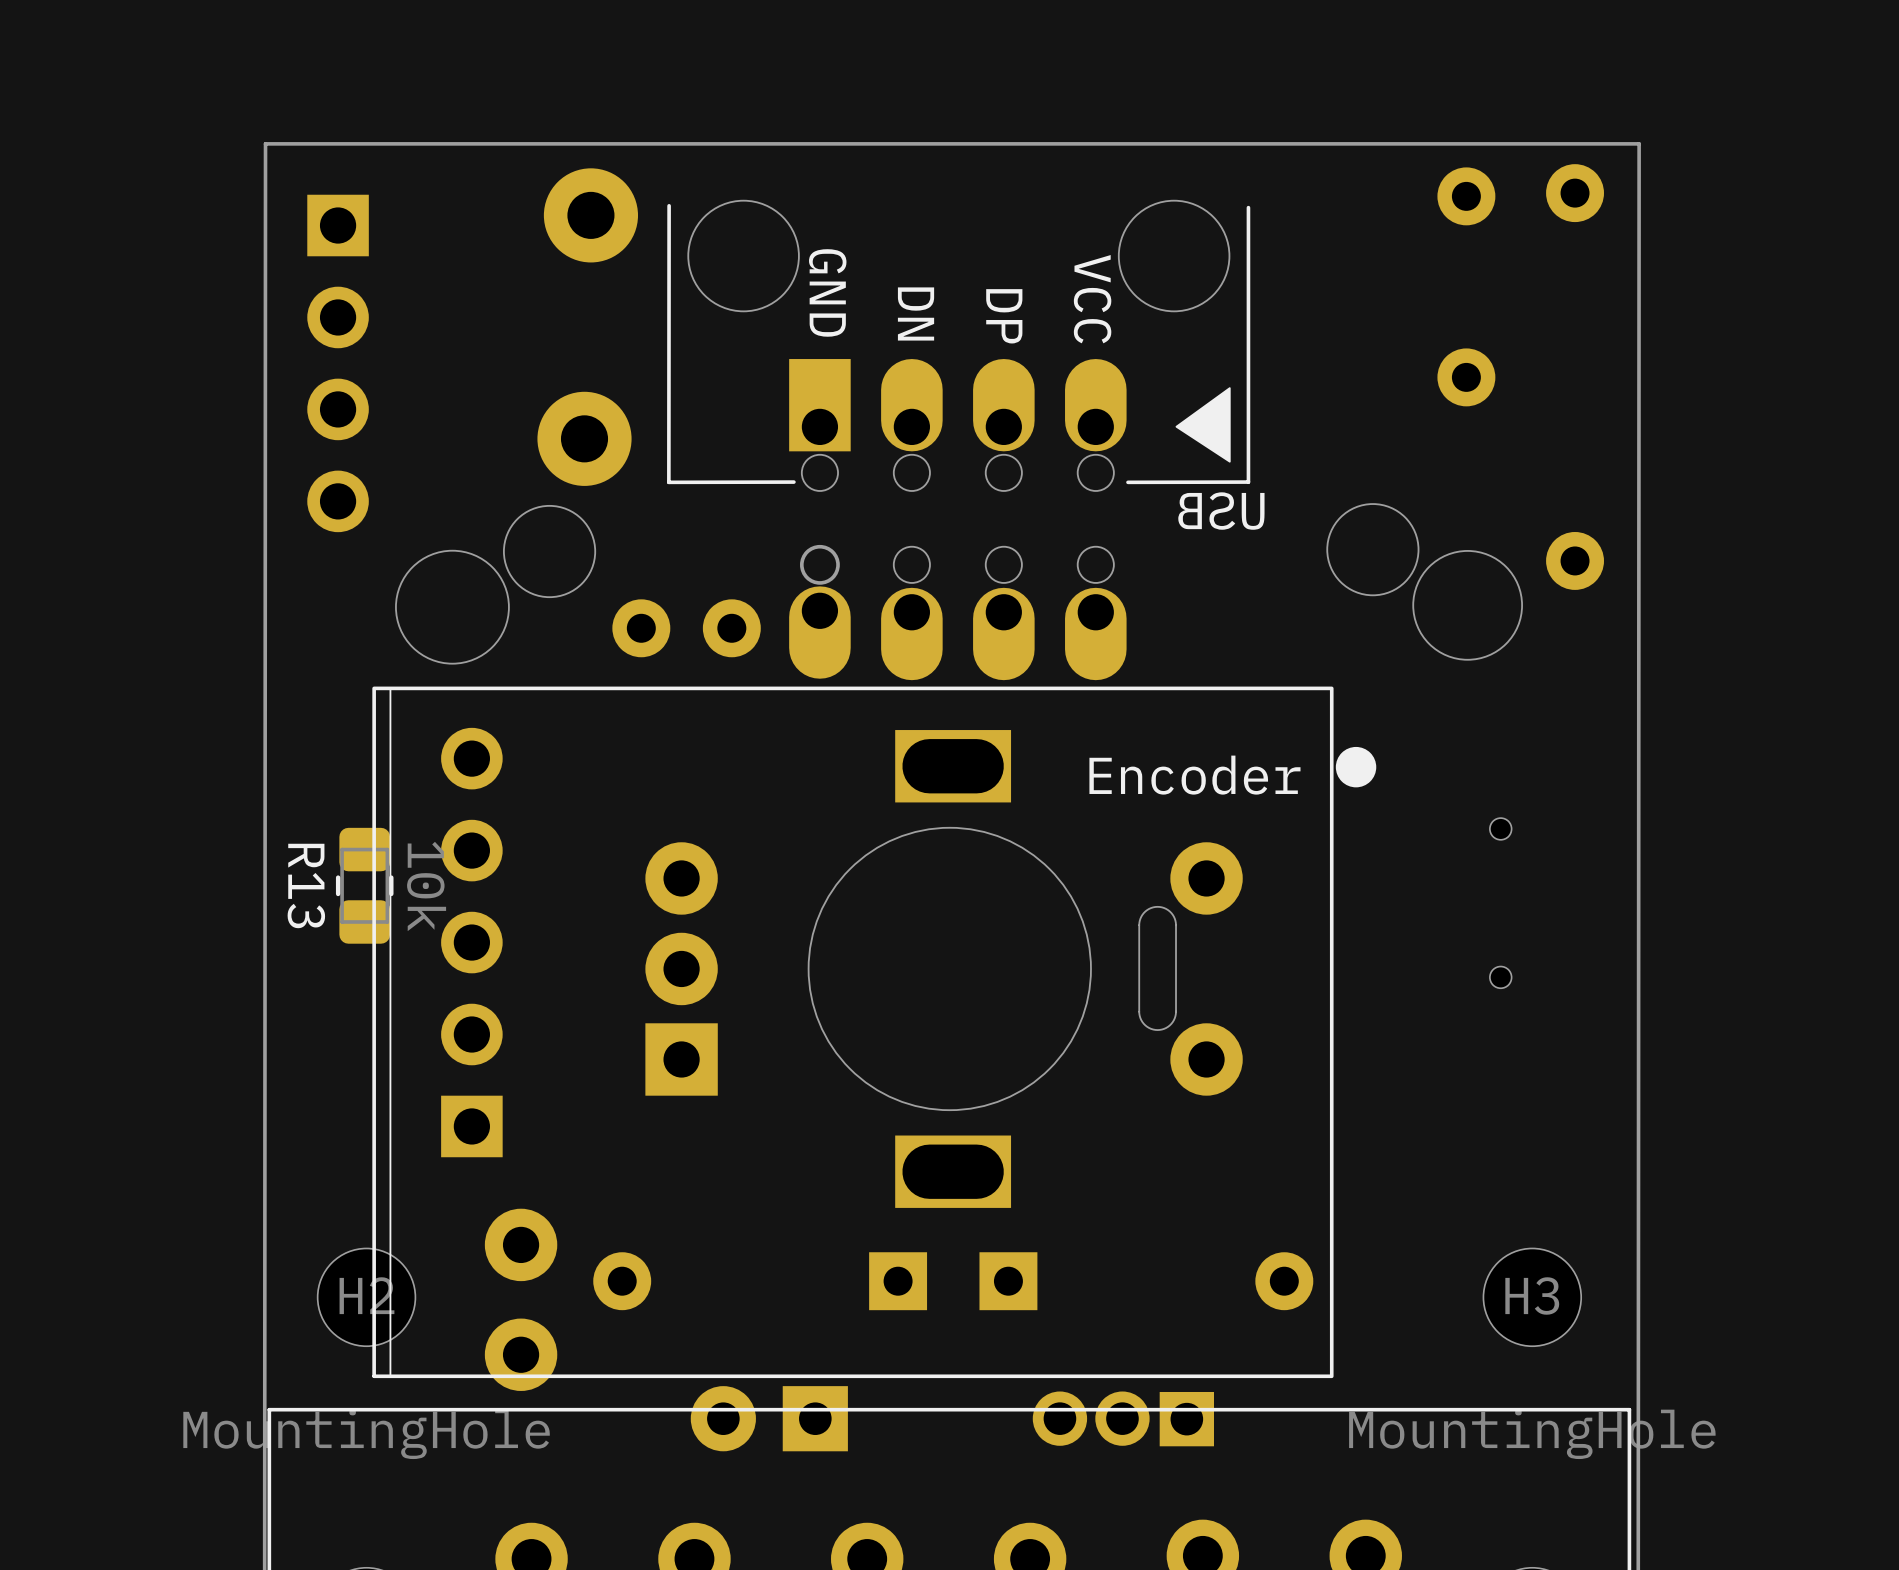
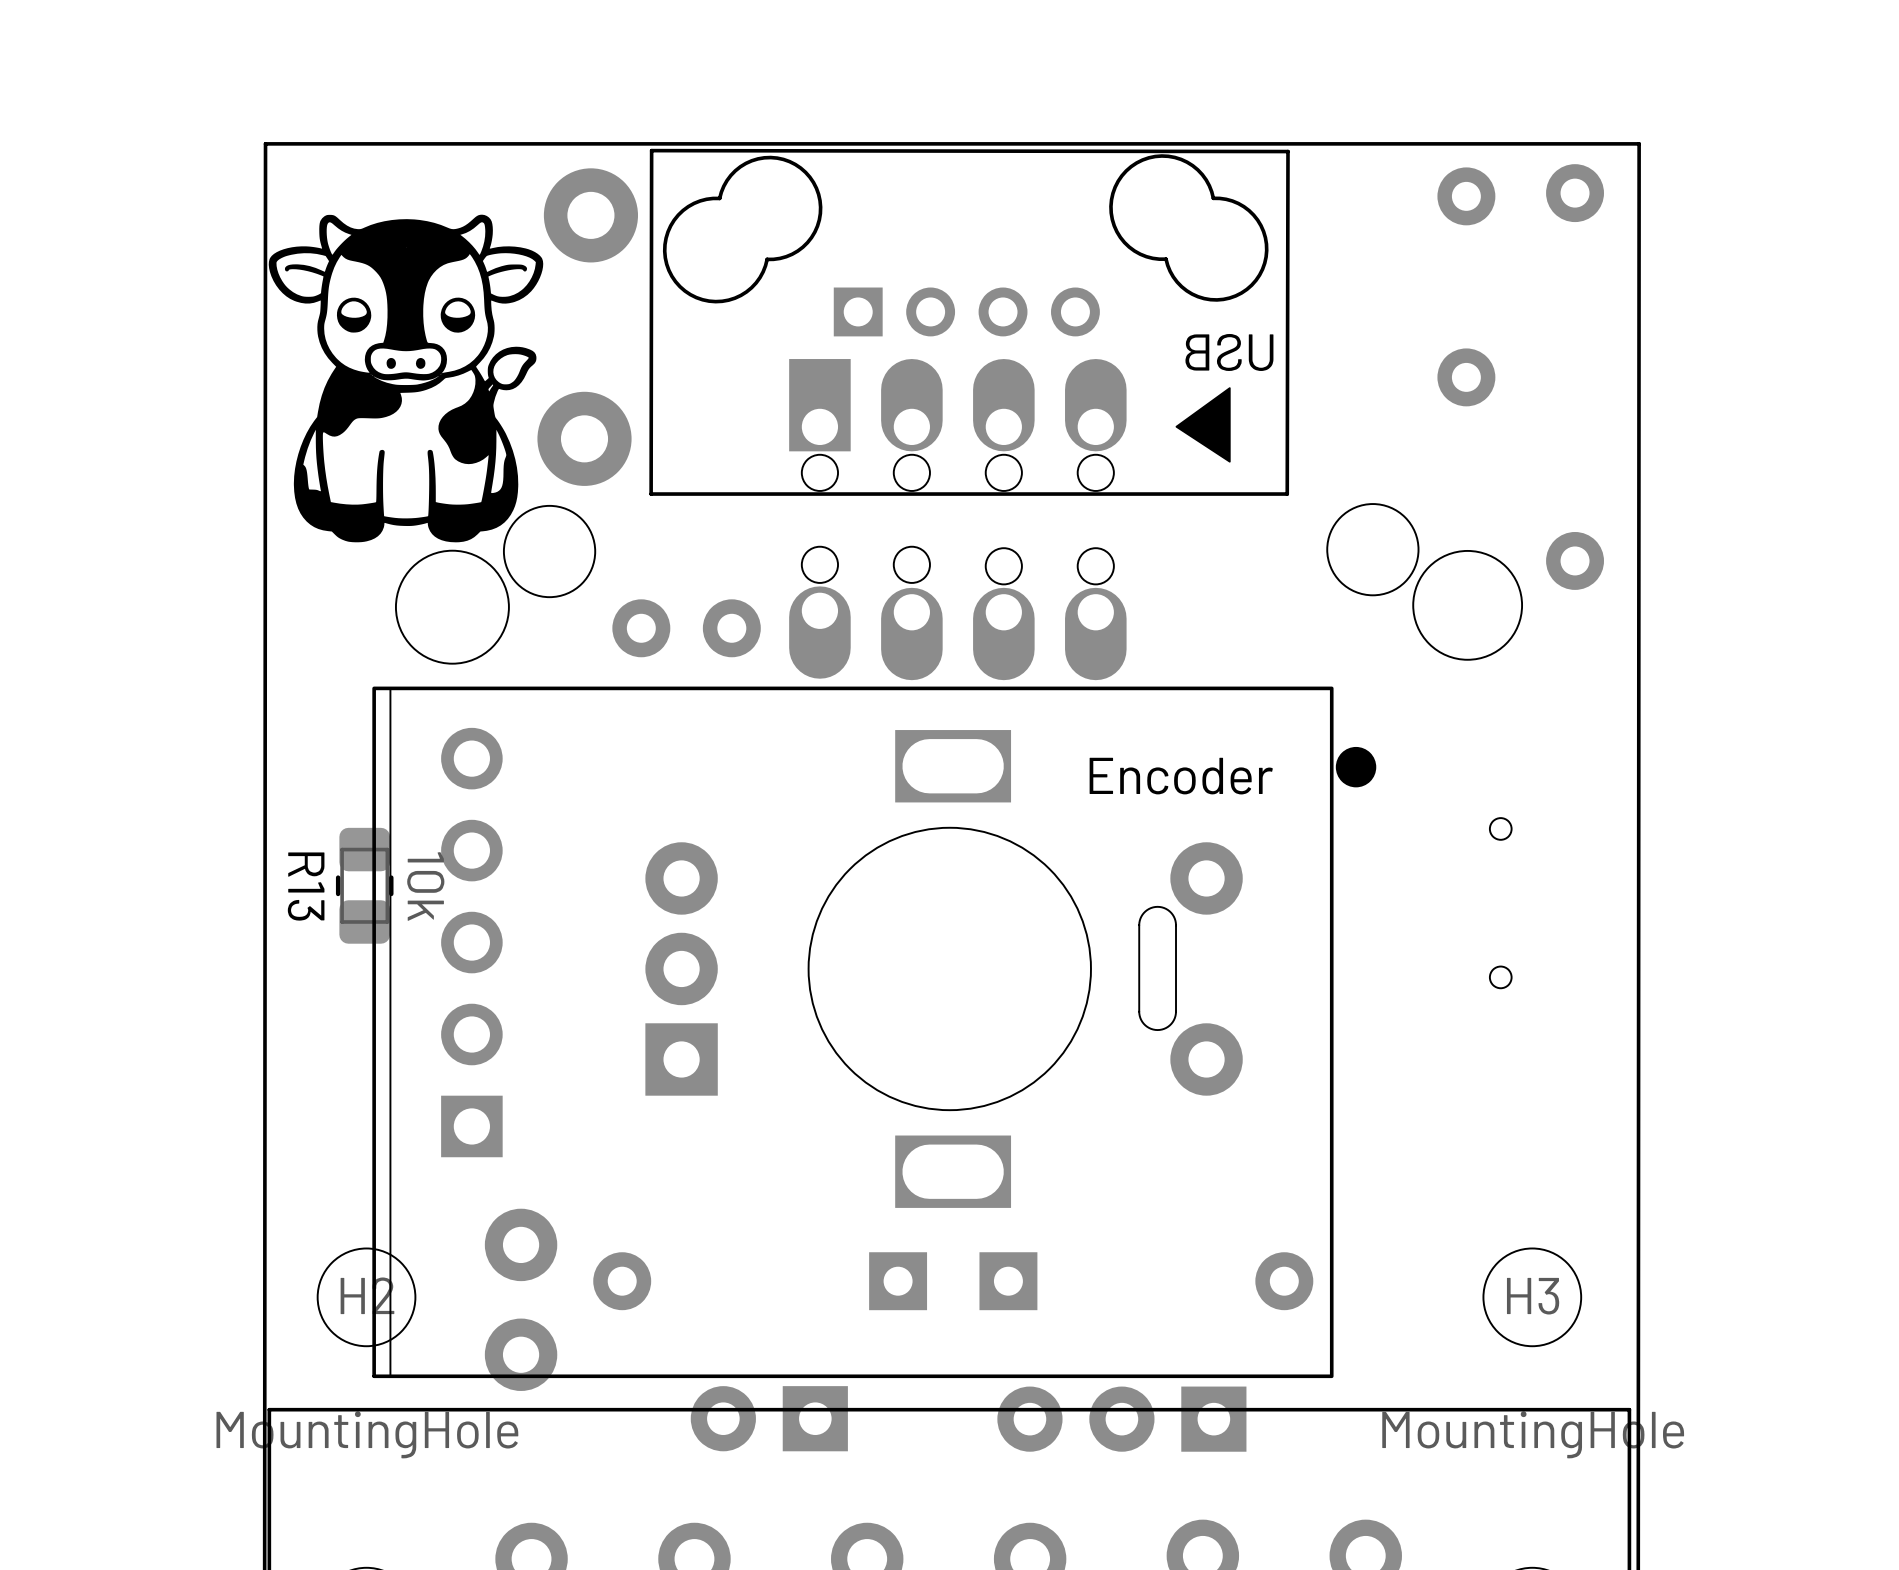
part footprint: [395, 199, 1523, 681] -> [395, 148, 1523, 681]
drawing: none -> [268, 214, 544, 543]
part: (338, 363) -> none
part footprint: [1032, 1391, 1214, 1447] -> [997, 1386, 1247, 1452]

